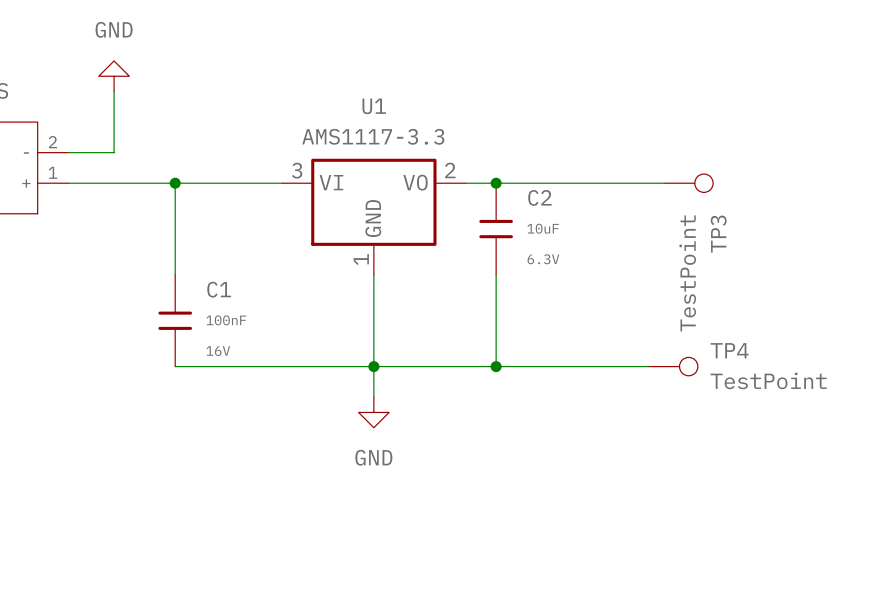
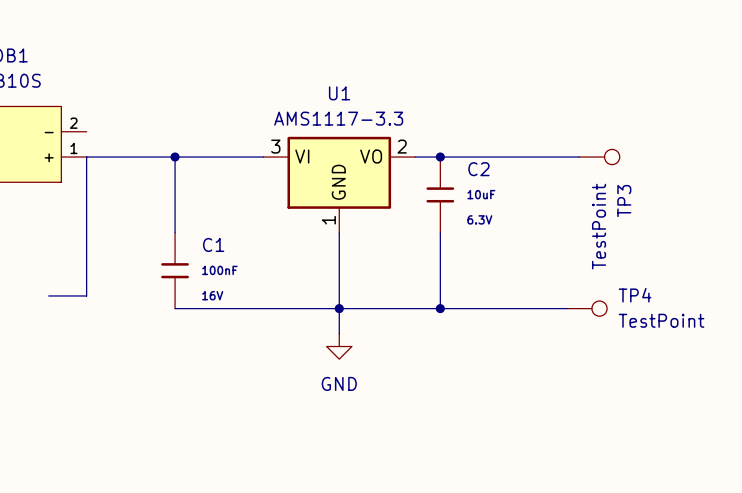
power symbol: GND (114, 76) -> none
wire: (114, 91) (114, 152) (68, 152) -> none
wire: none -> (86, 157) (86, 295) (48, 295)

